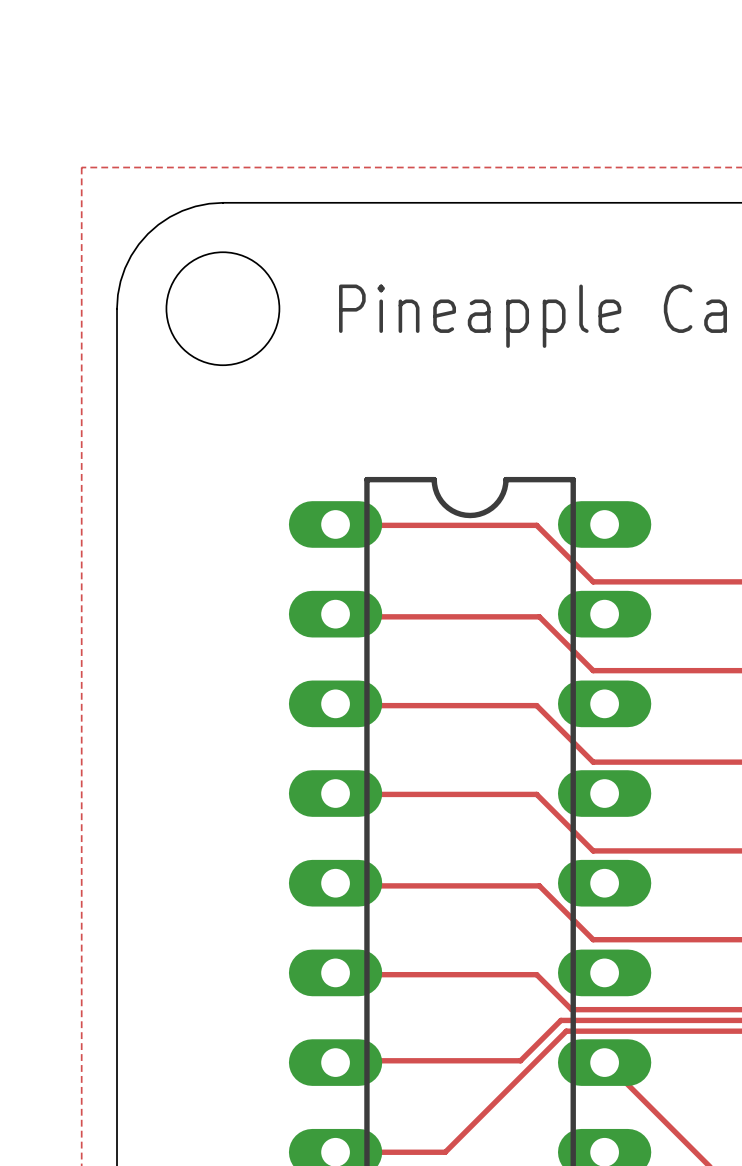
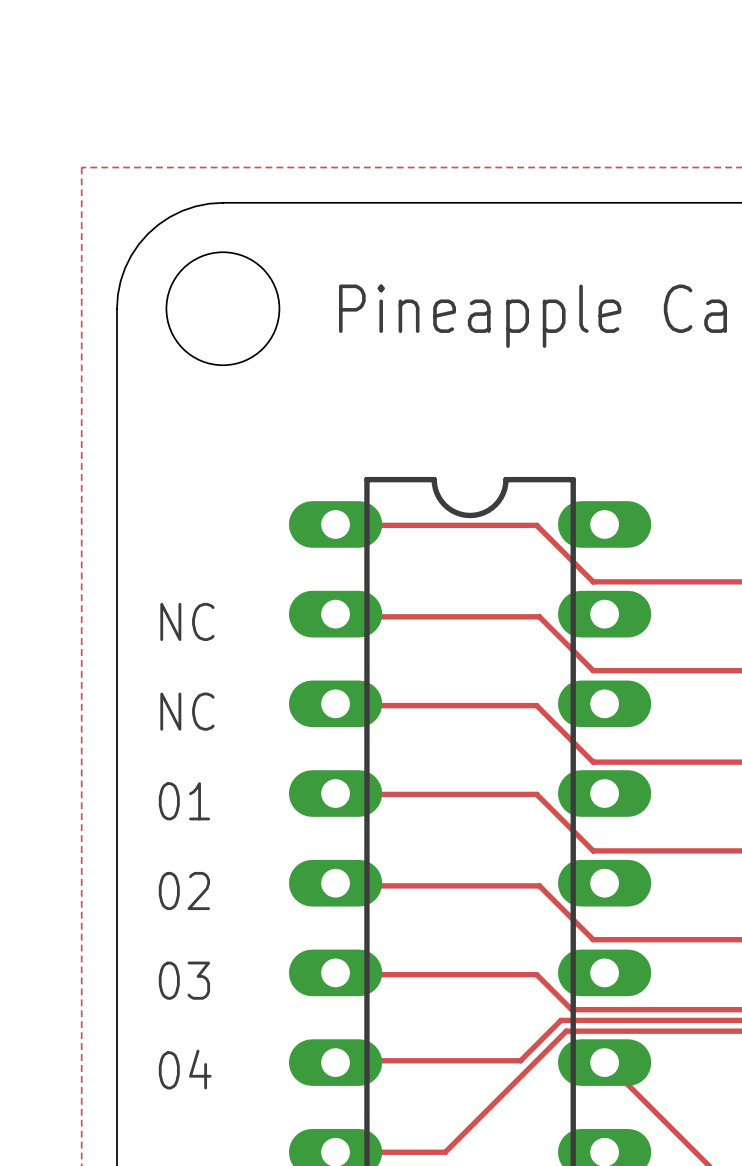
text: none -> NC (187, 621)
text: none -> NC (187, 711)
text: none -> 01 (184, 801)
text: none -> 02 (184, 890)
text: none -> 03 (184, 980)
text: none -> 04 (185, 1069)

